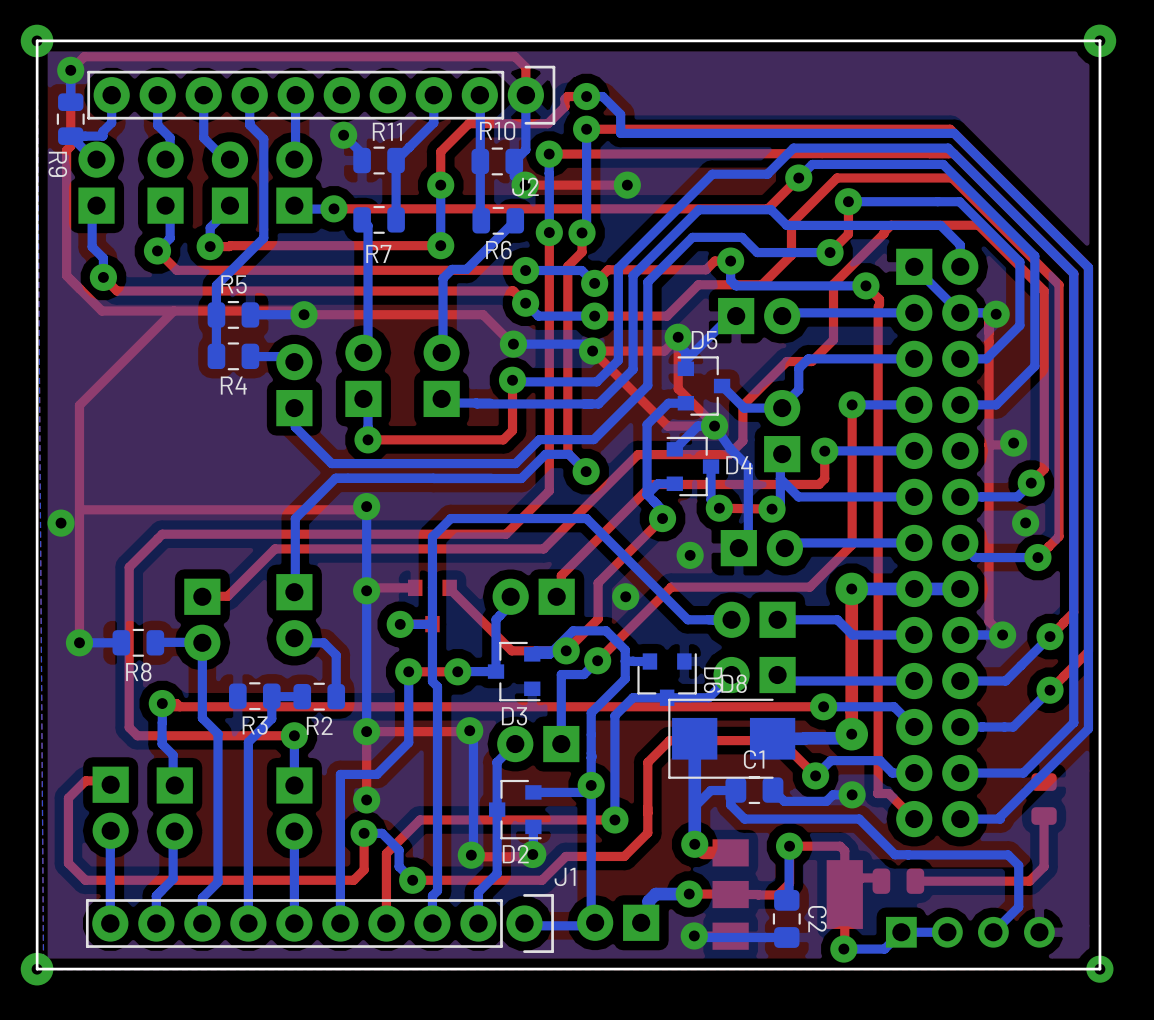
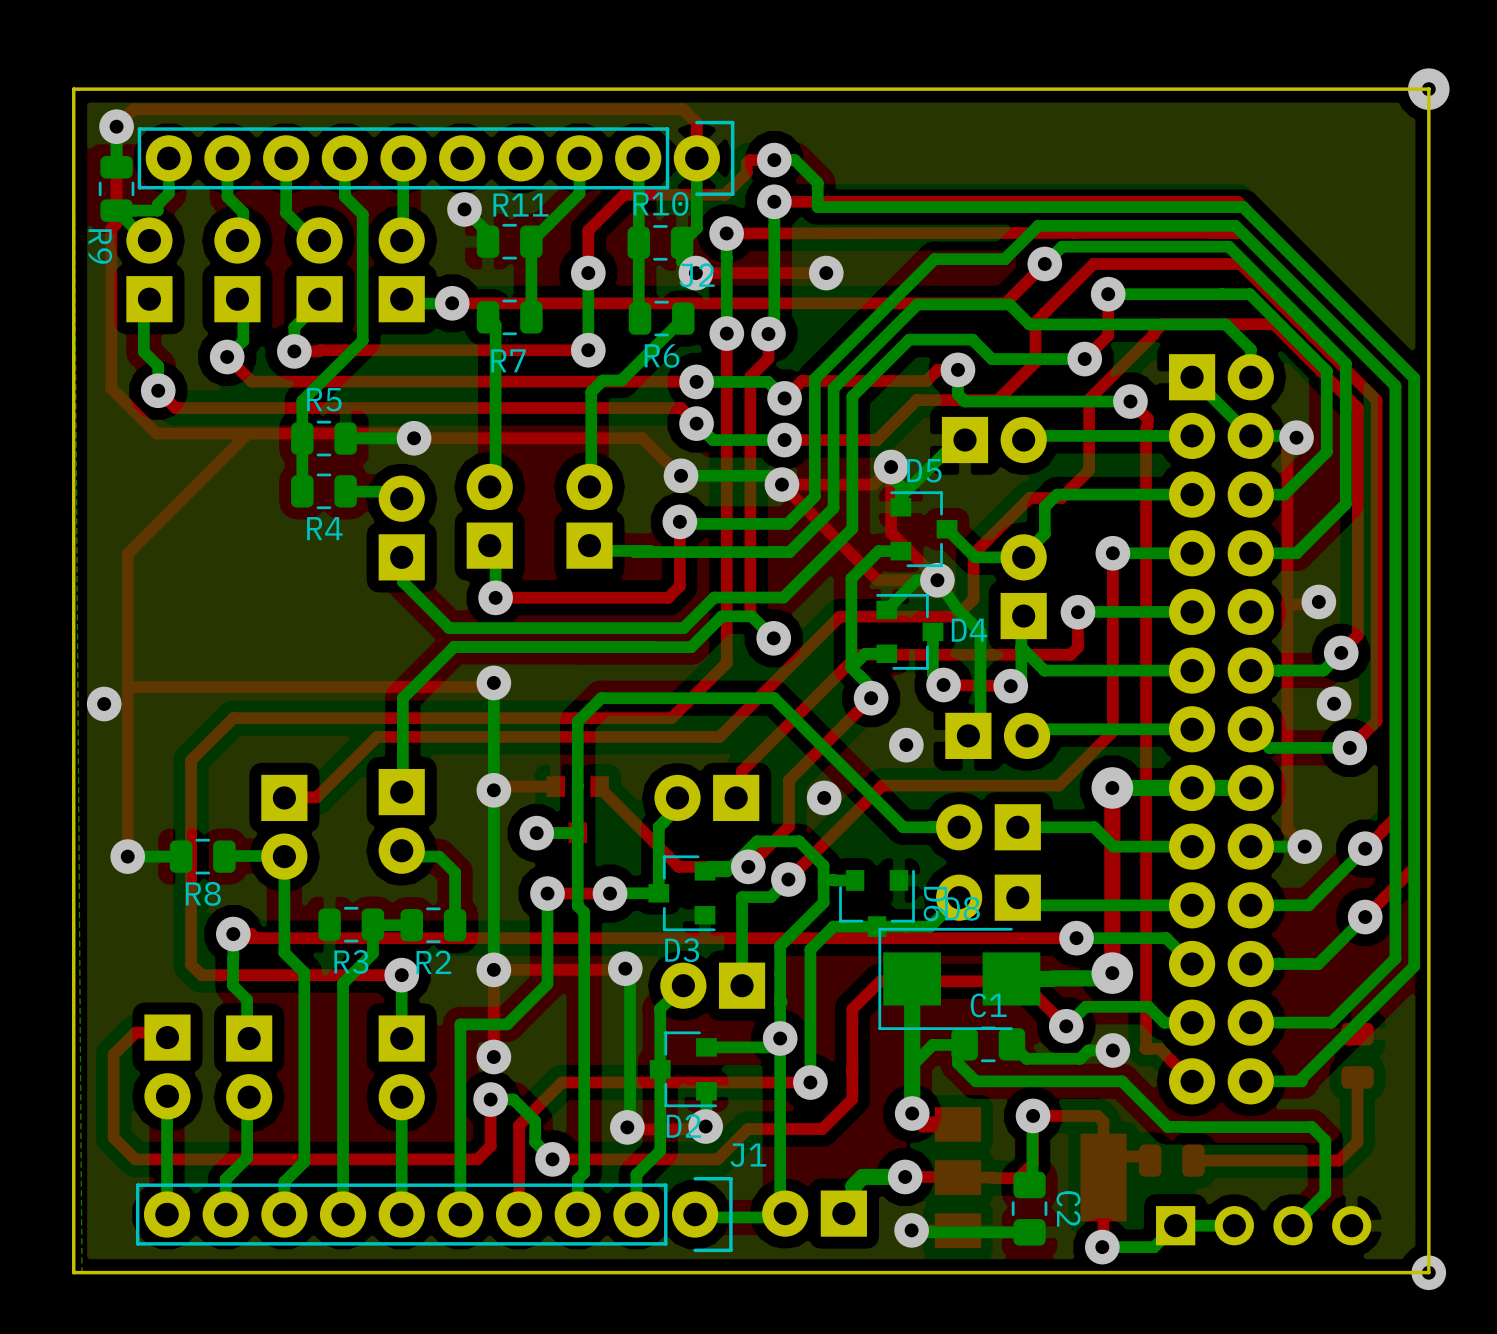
via: (37, 40) -> none
via: (37, 969) -> none

